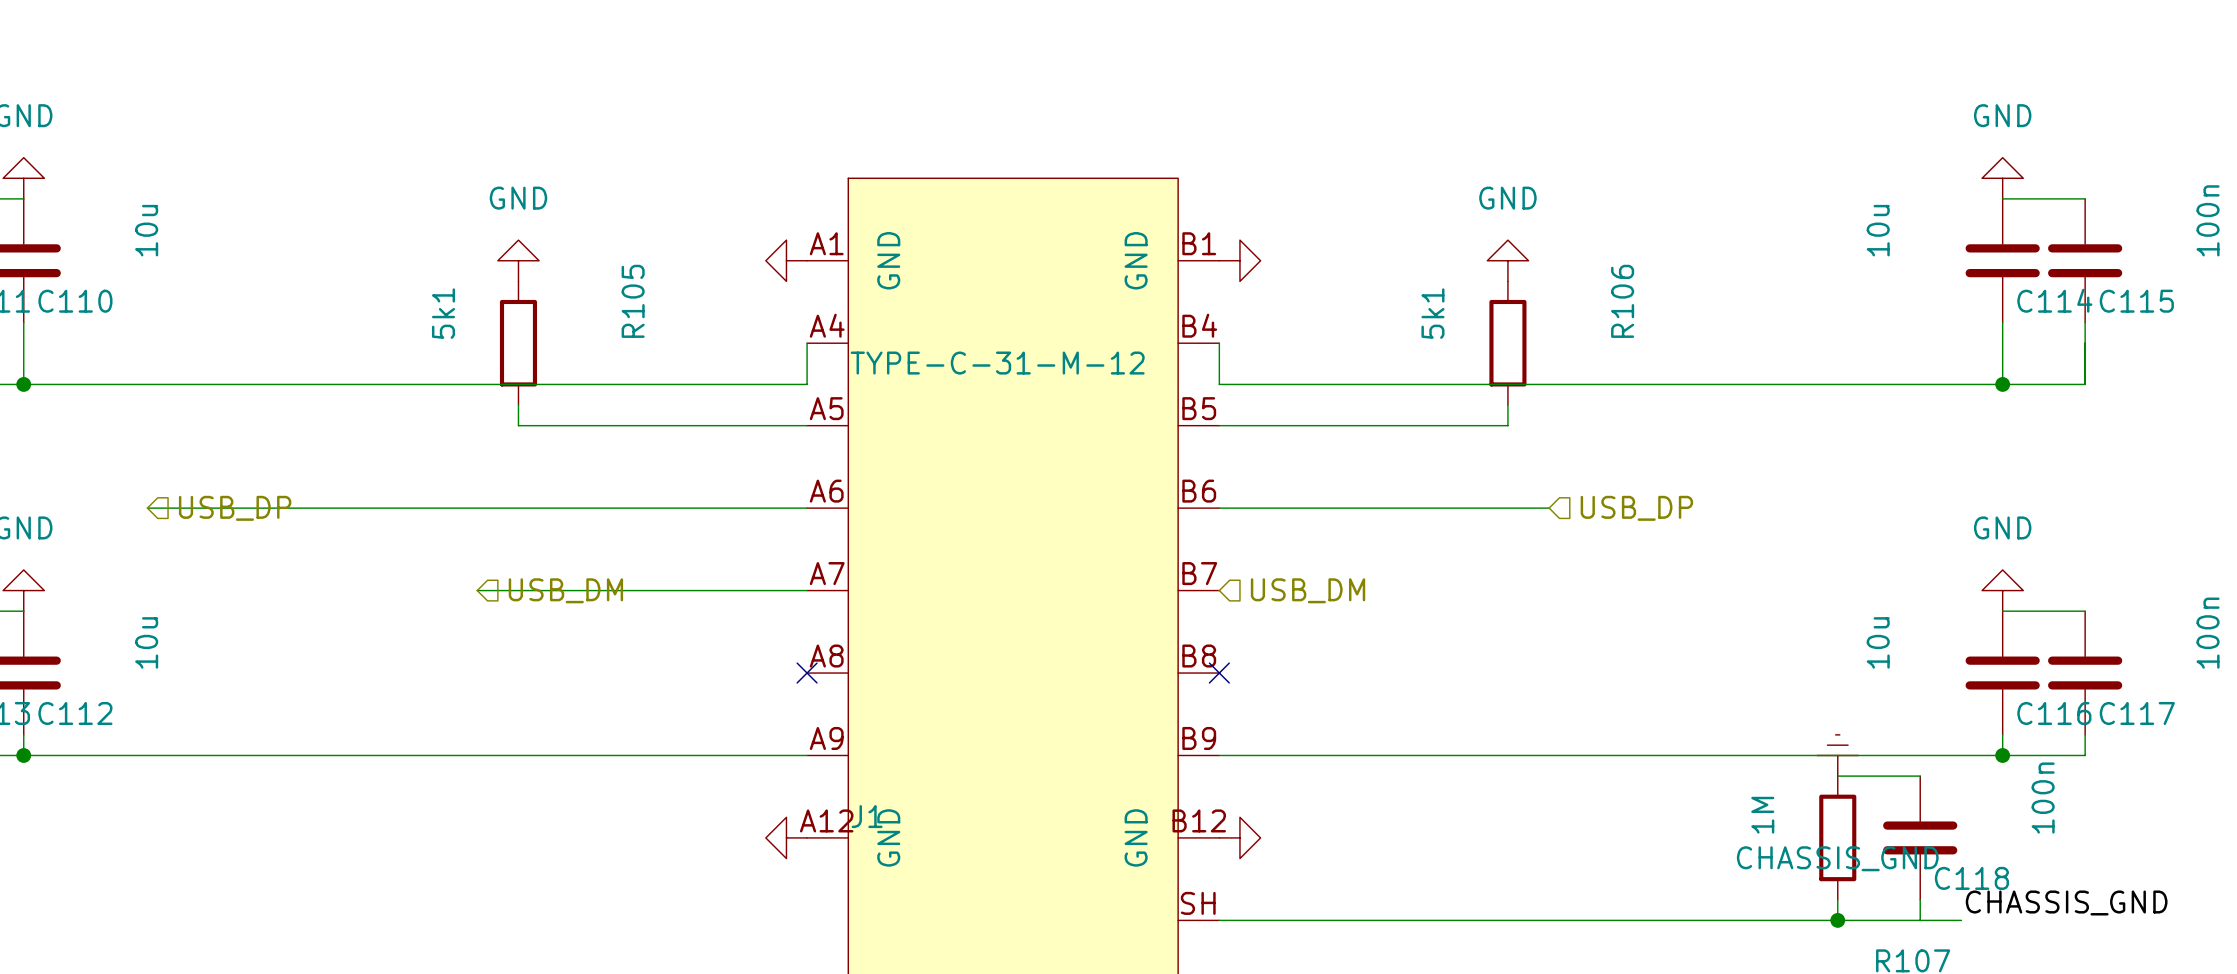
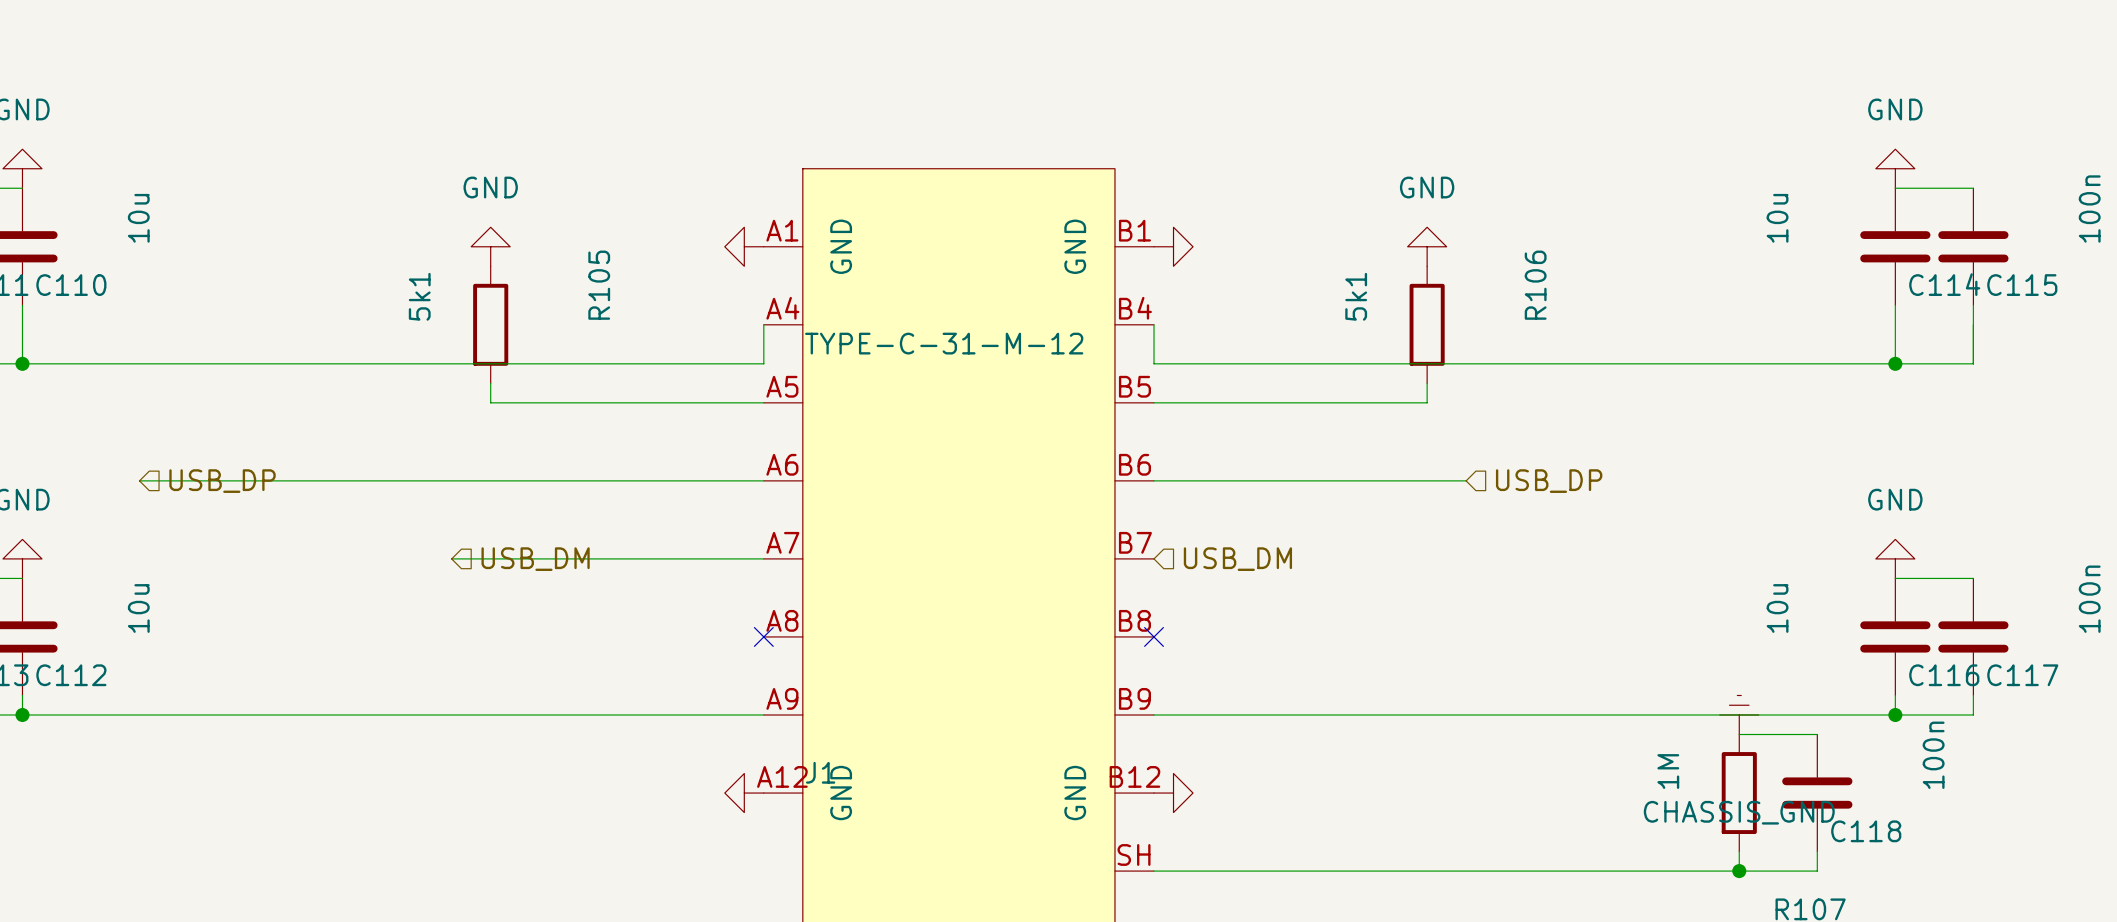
label: CHASSIS_GND (2066, 902) -> none
wire: (1920, 920) (1961, 920) -> none

